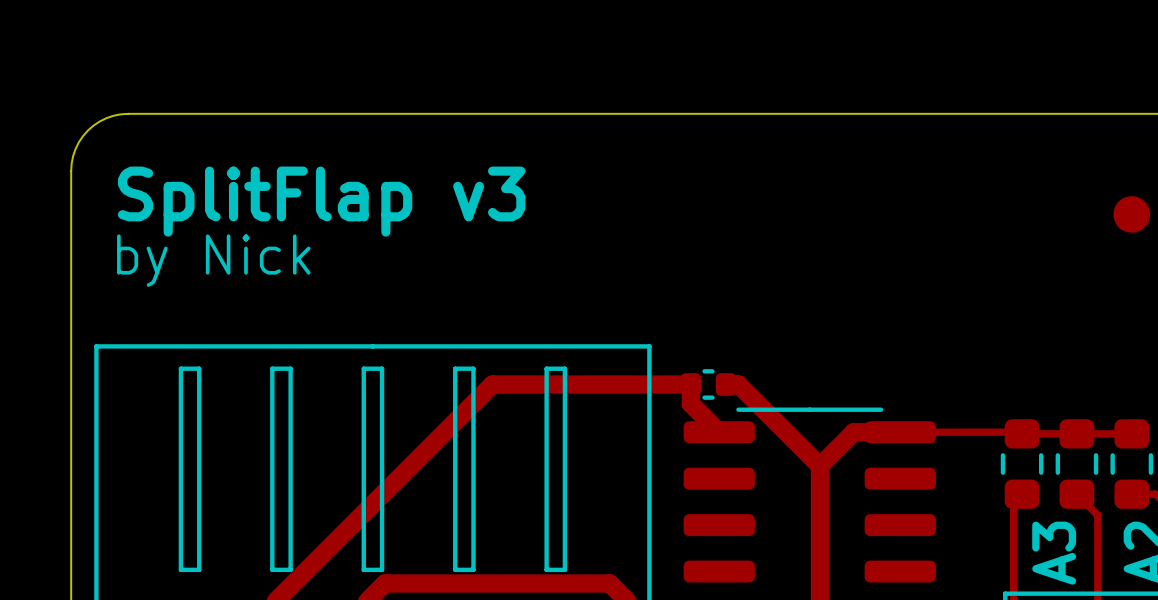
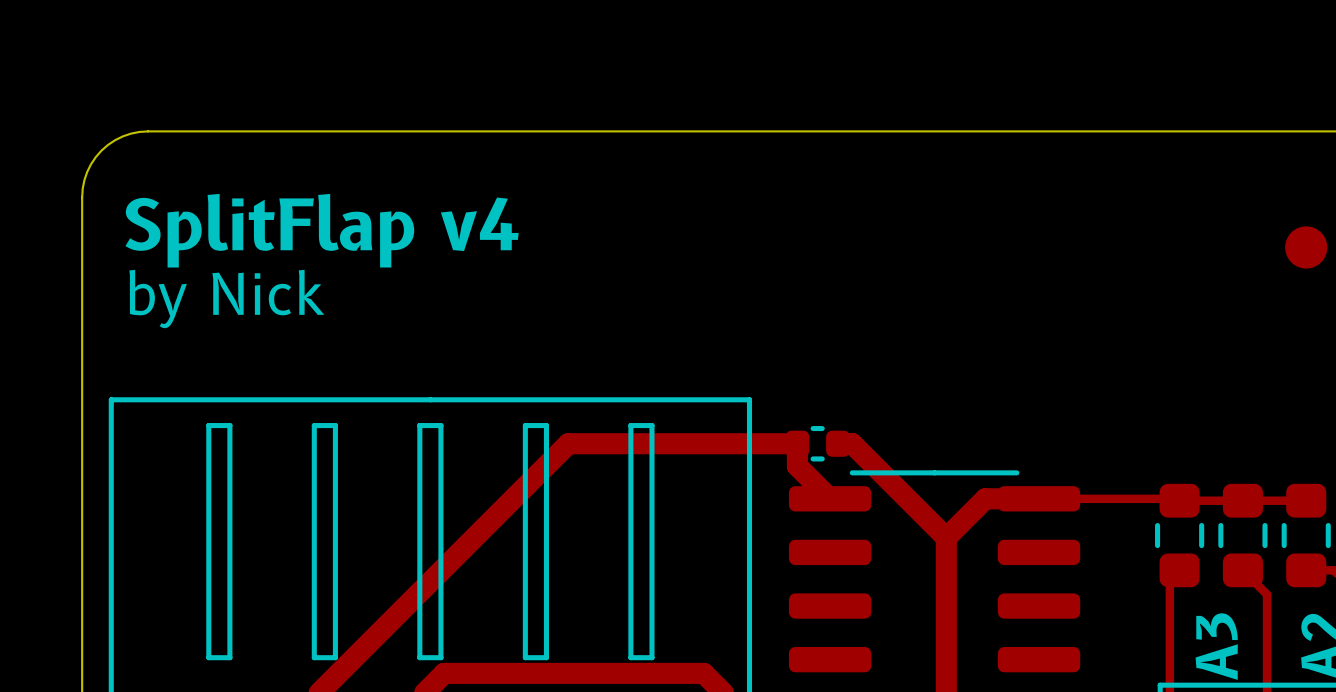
text: SplitFlap v3 (321, 201) -> SplitFlap v4 (322, 230)

